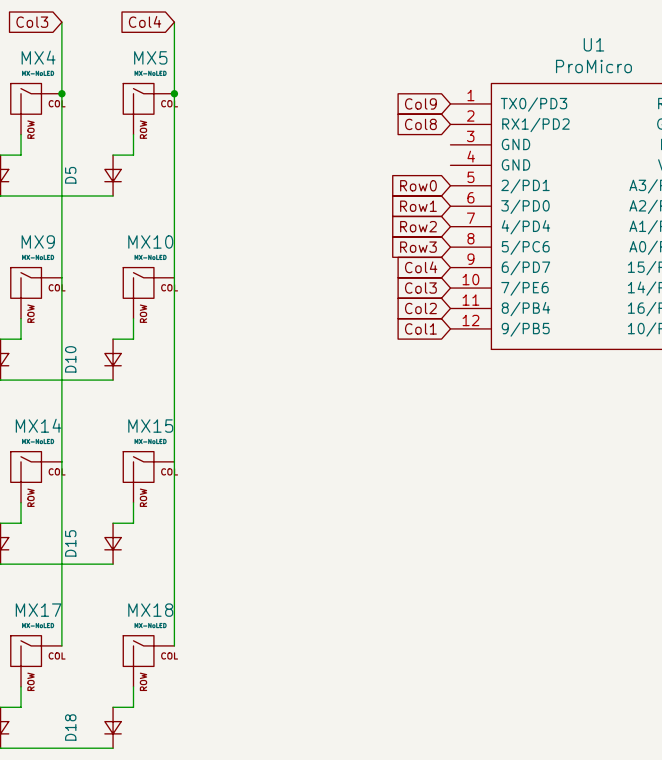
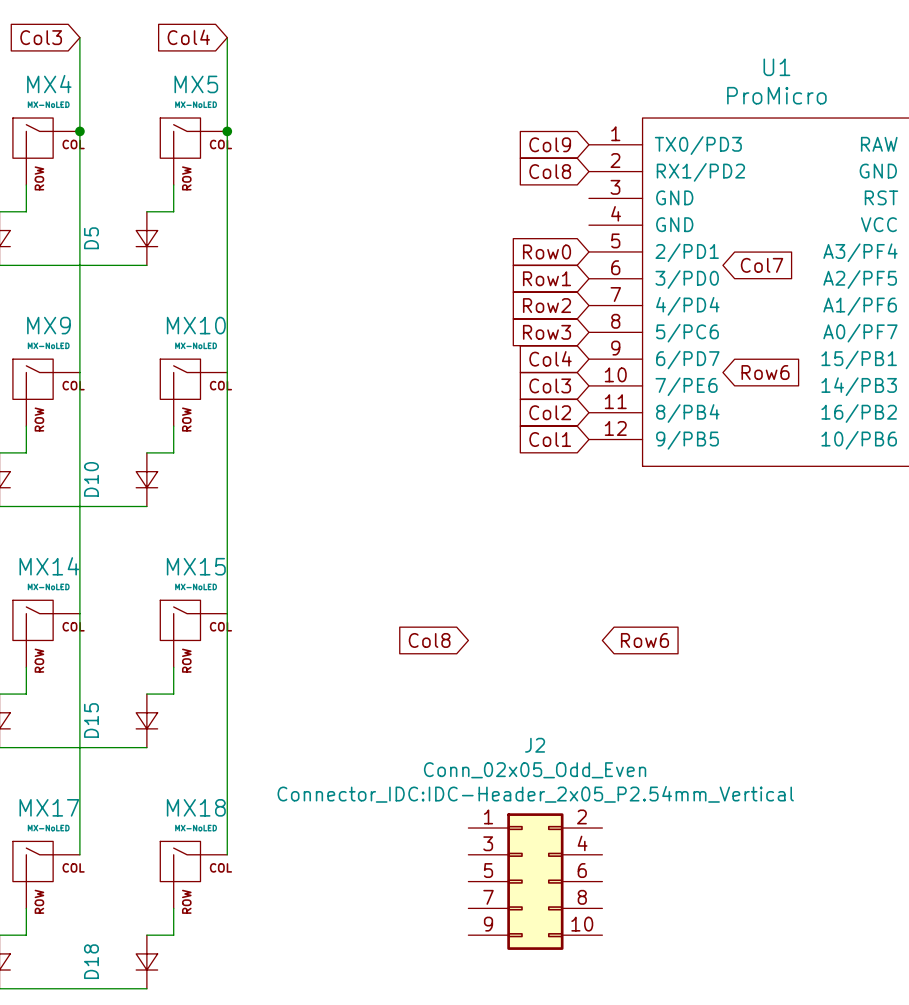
global label: none -> Col7 (762, 265)
global label: none -> Row6 (765, 372)
global label: none -> Col8 (429, 640)
global label: none -> Row6 (644, 640)
J2: none -> Conn_02x05_Odd_Even (535, 881)

